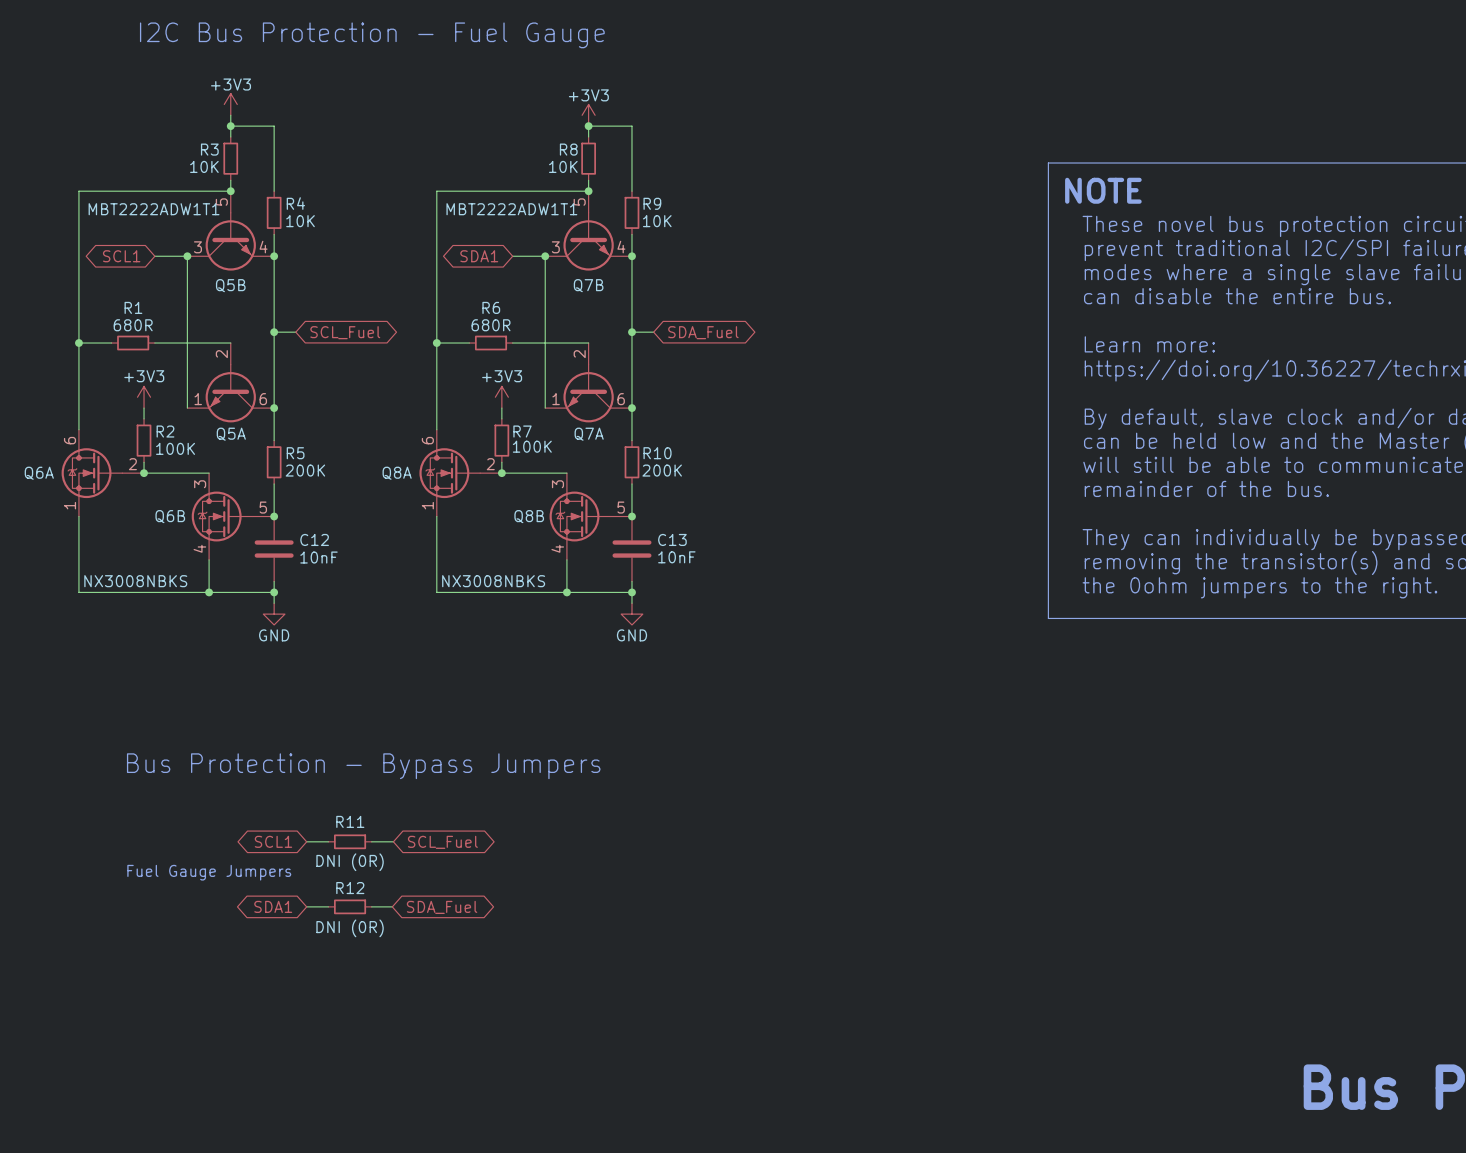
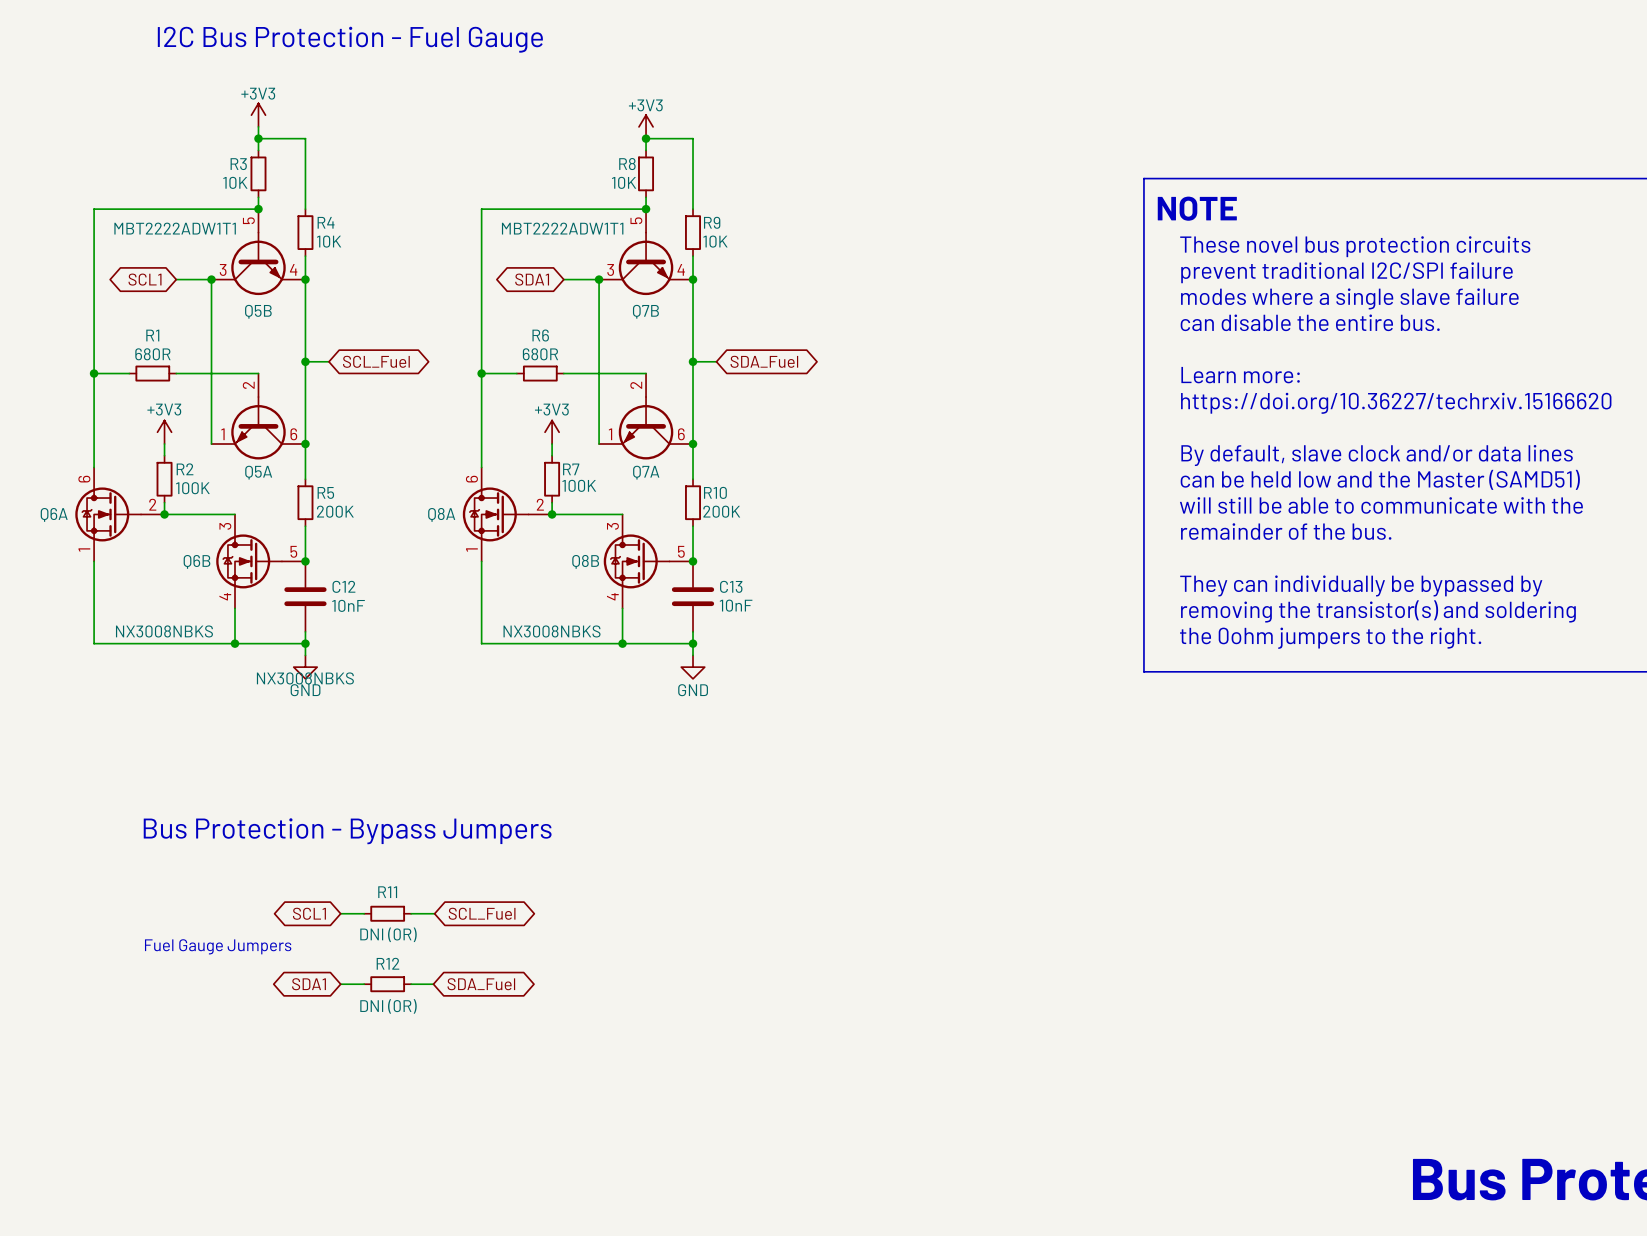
Q6B value: none -> NX3008NBKS (305, 678)

